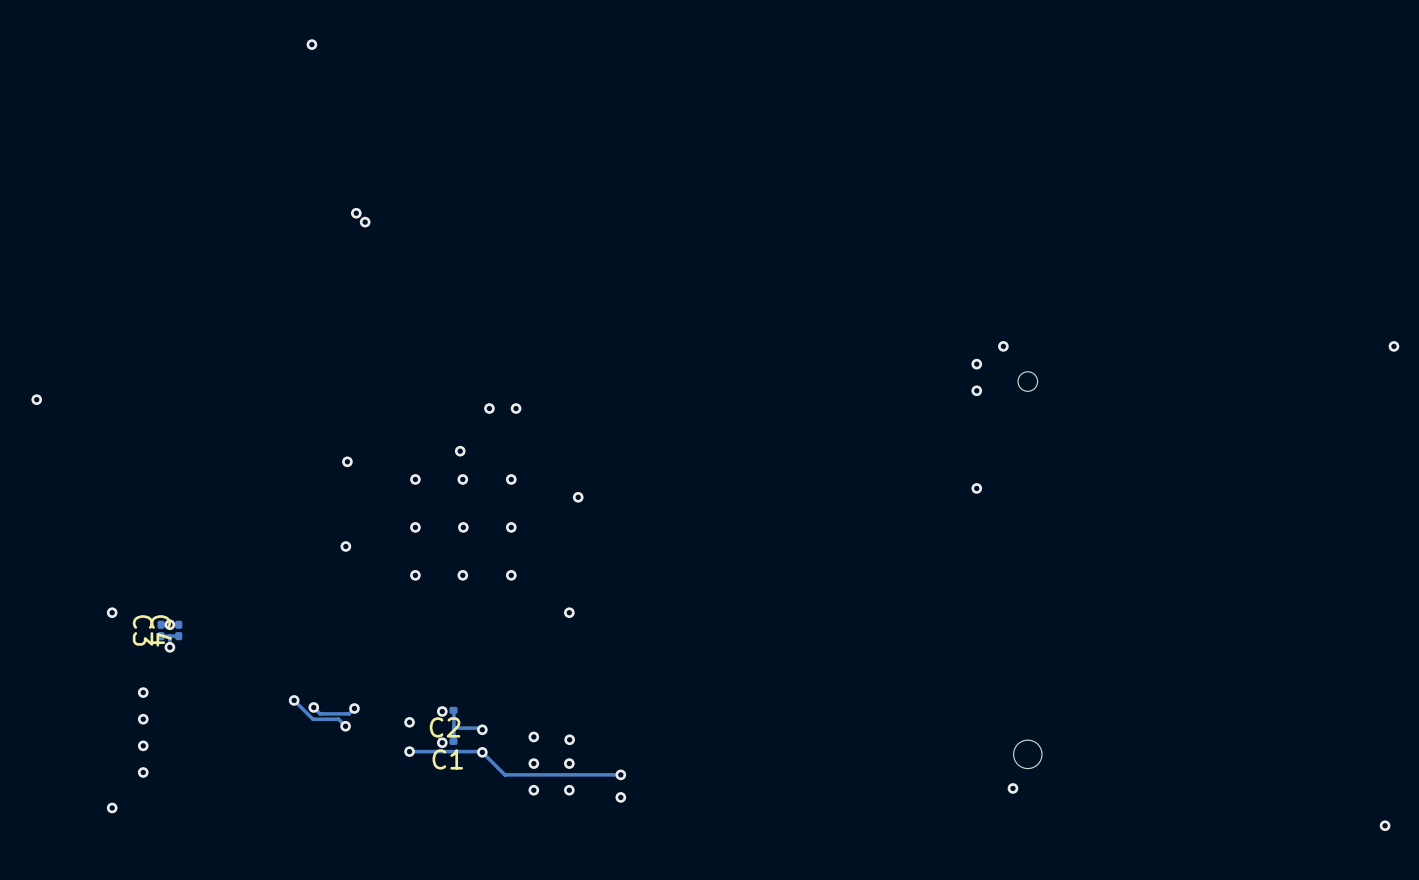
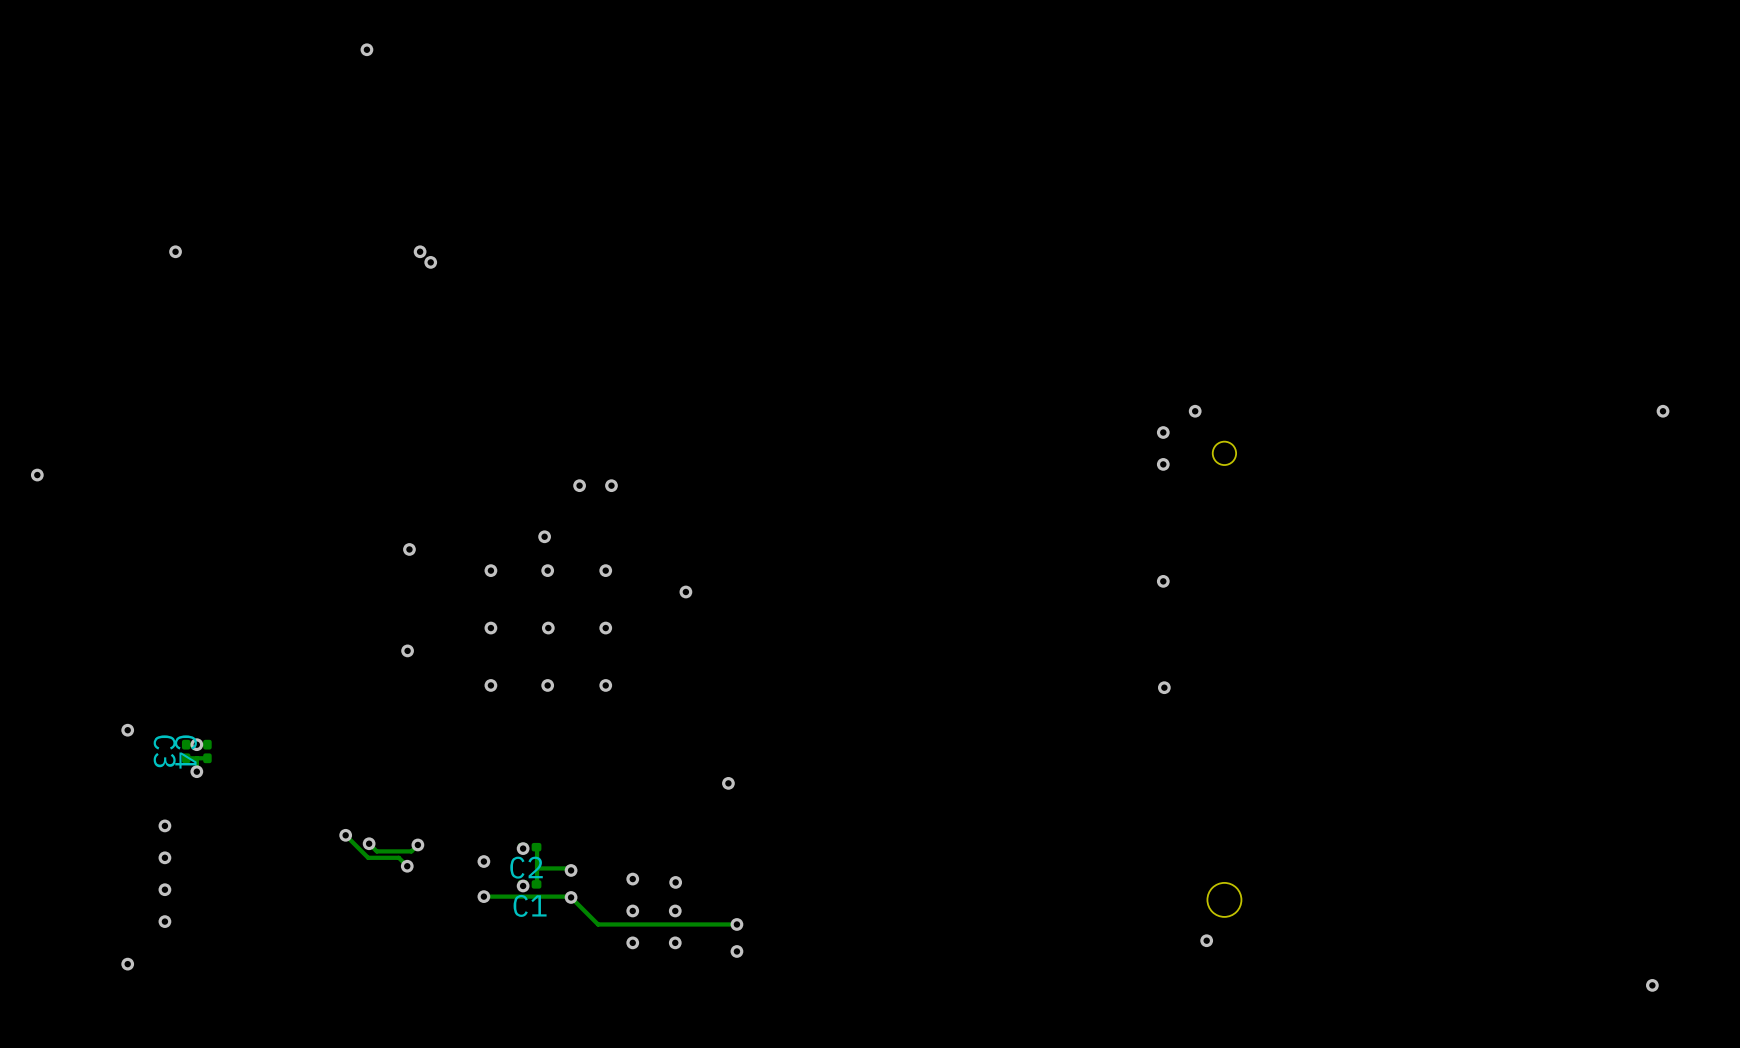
via: none -> (175, 251)
via: none -> (1164, 687)
via position: (569, 612) -> (728, 783)

